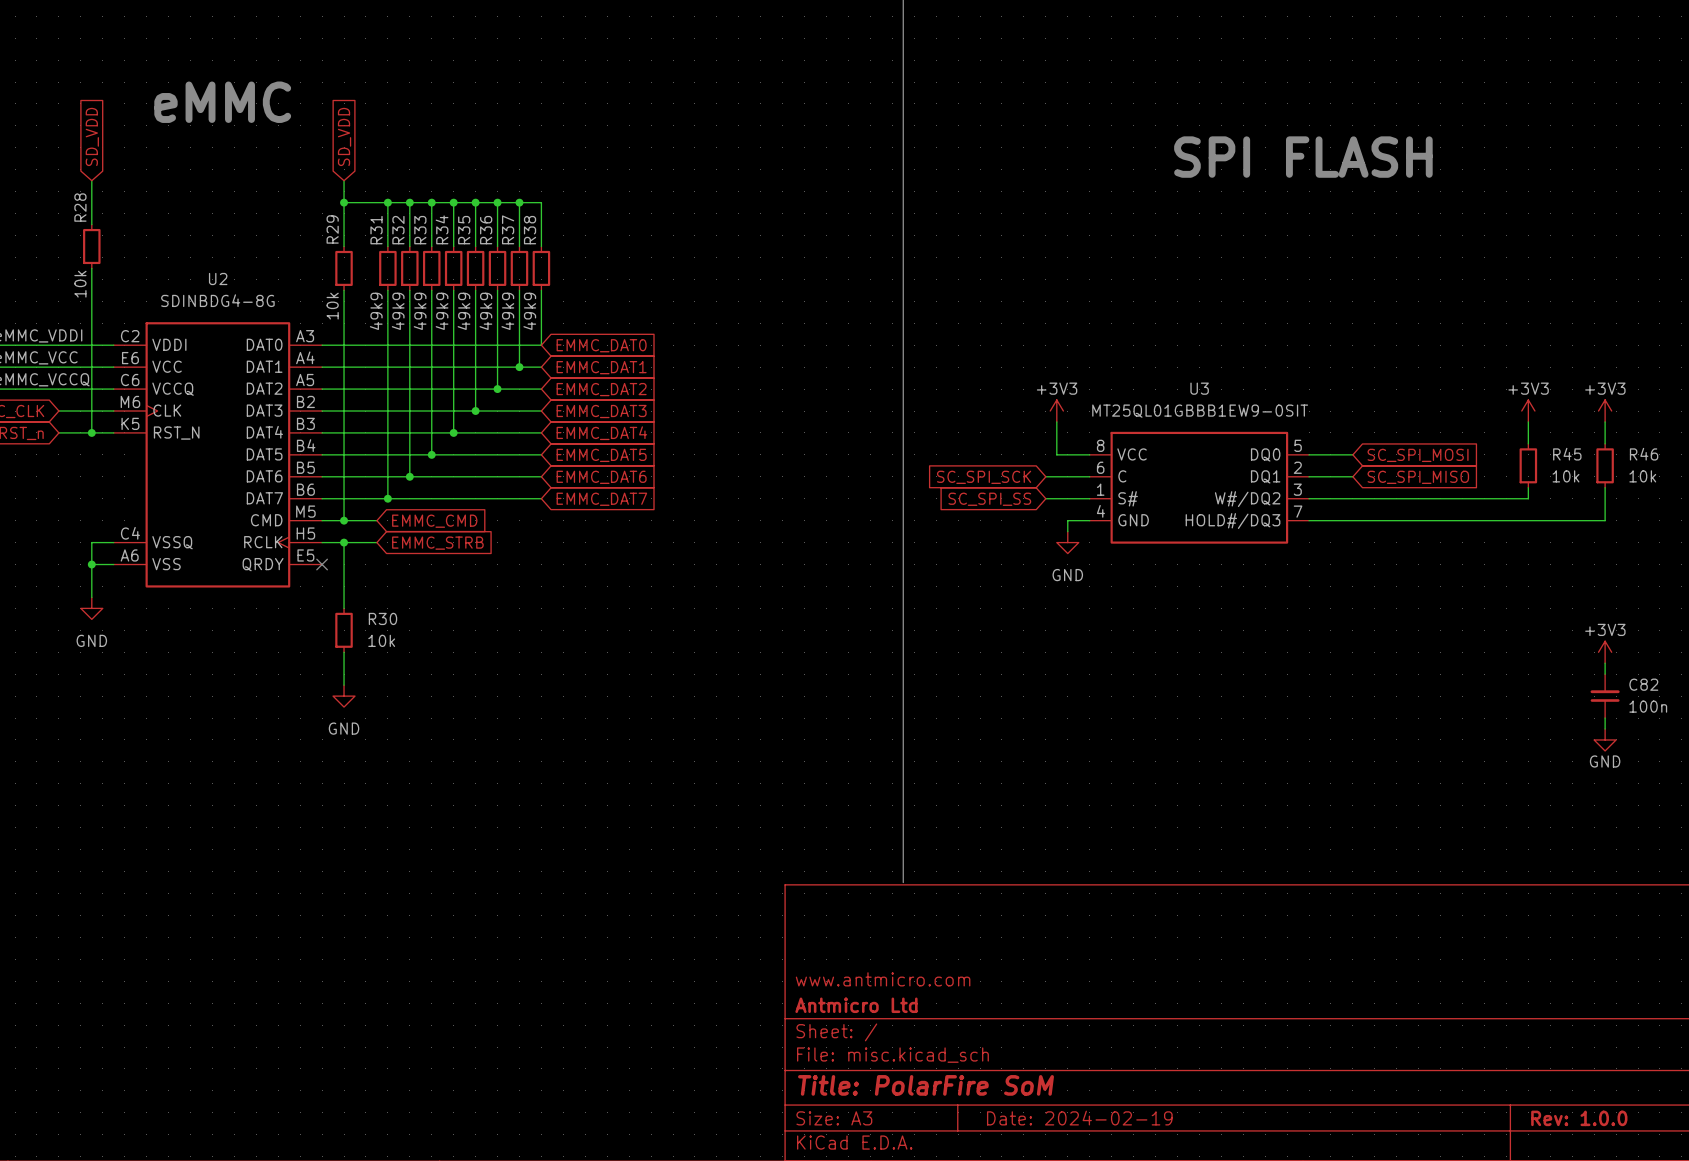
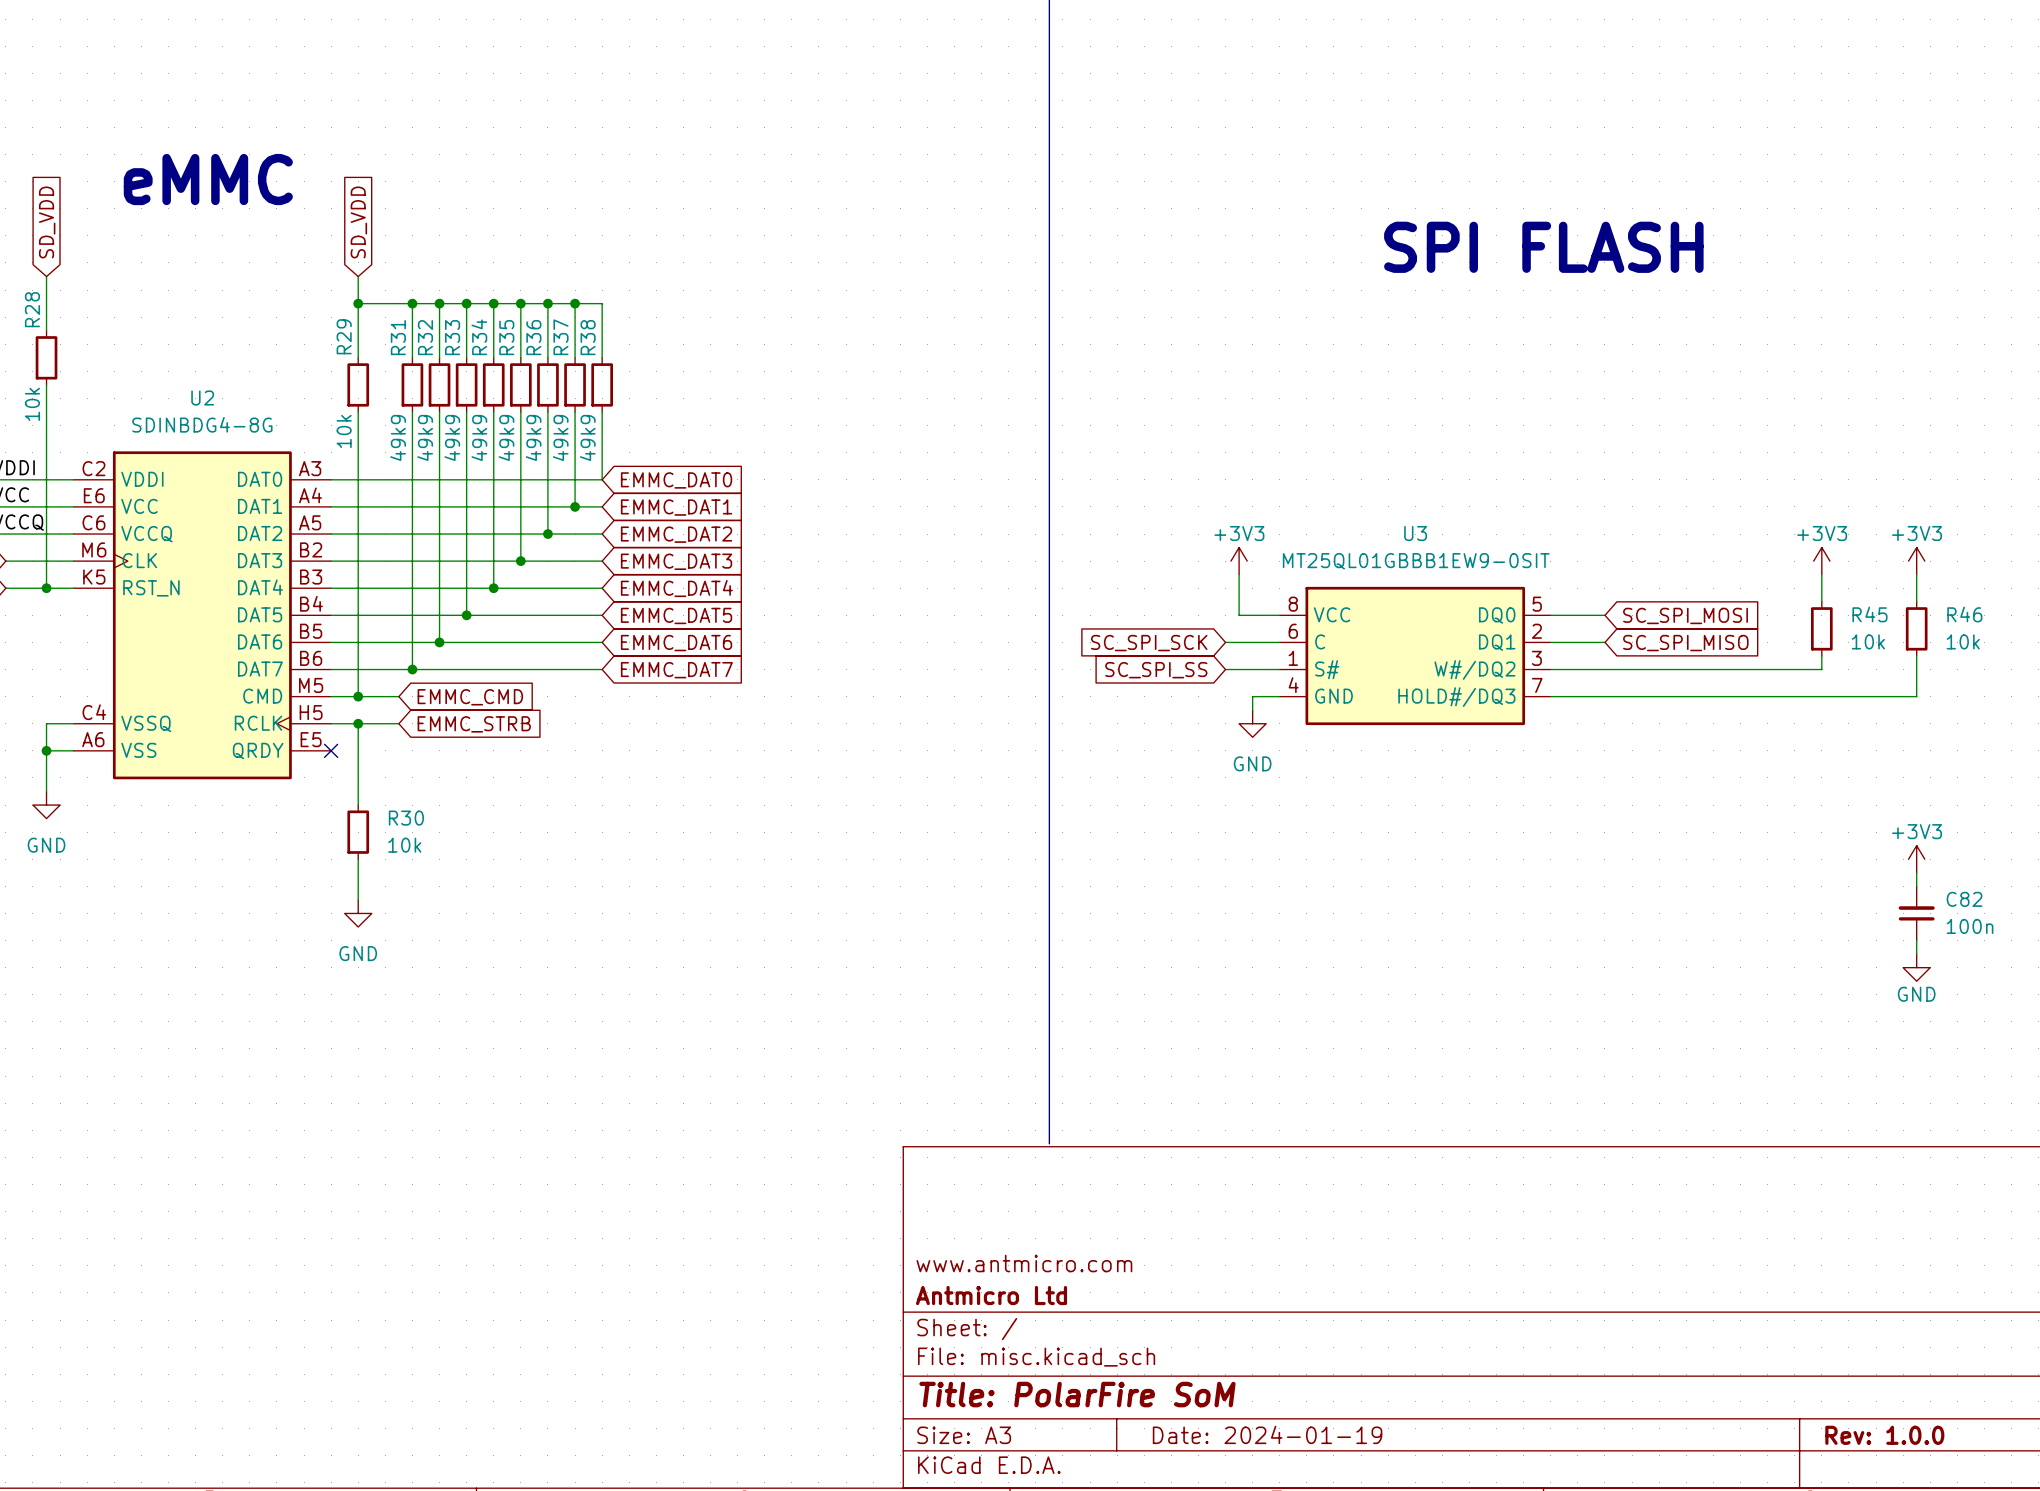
title block: Date: 2024-02-19 (1079, 1118) -> Date: 2024-01-19 (1267, 1434)

